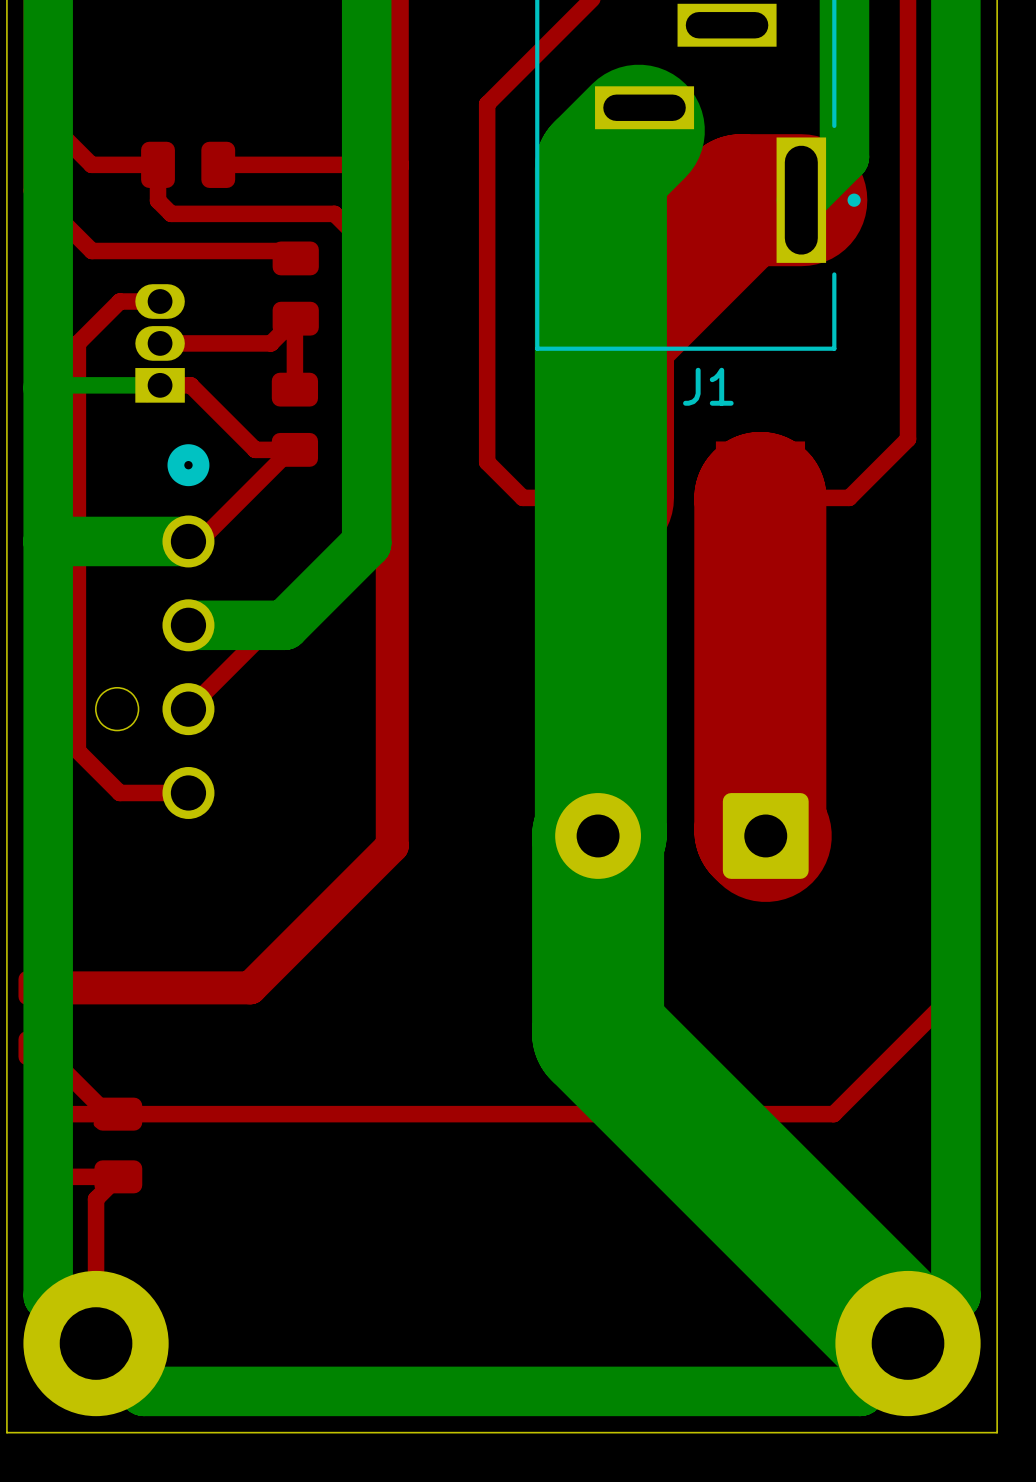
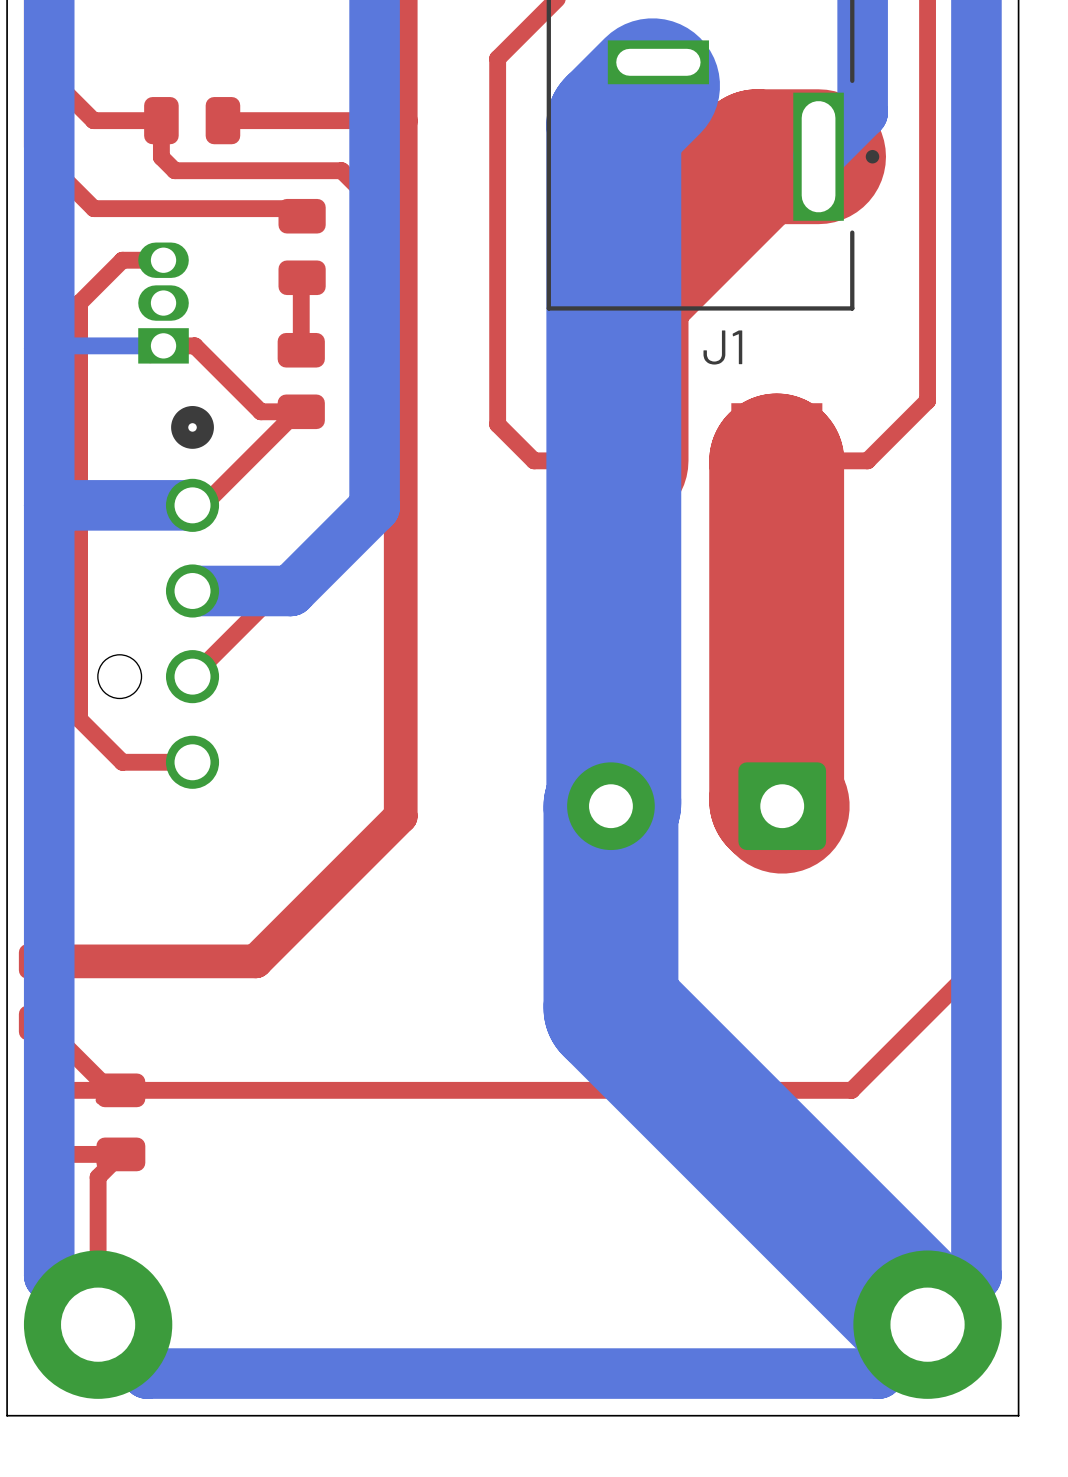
top track: (294, 319) (270, 343) (160, 343) -> none

